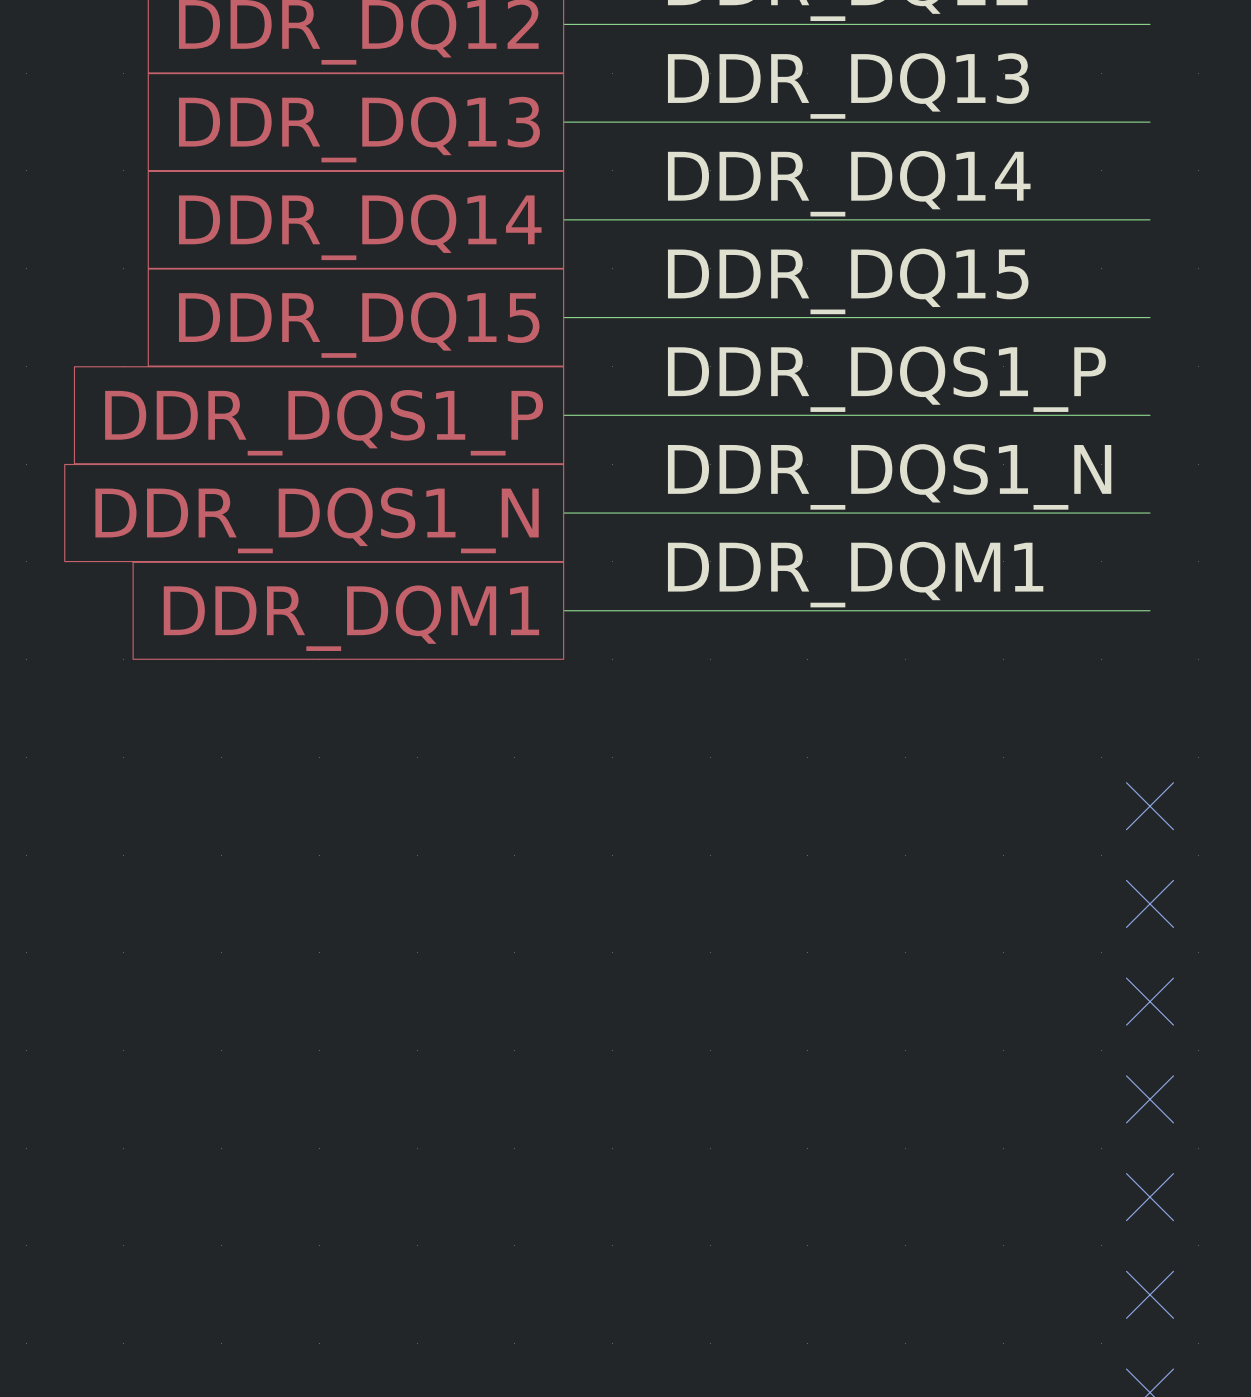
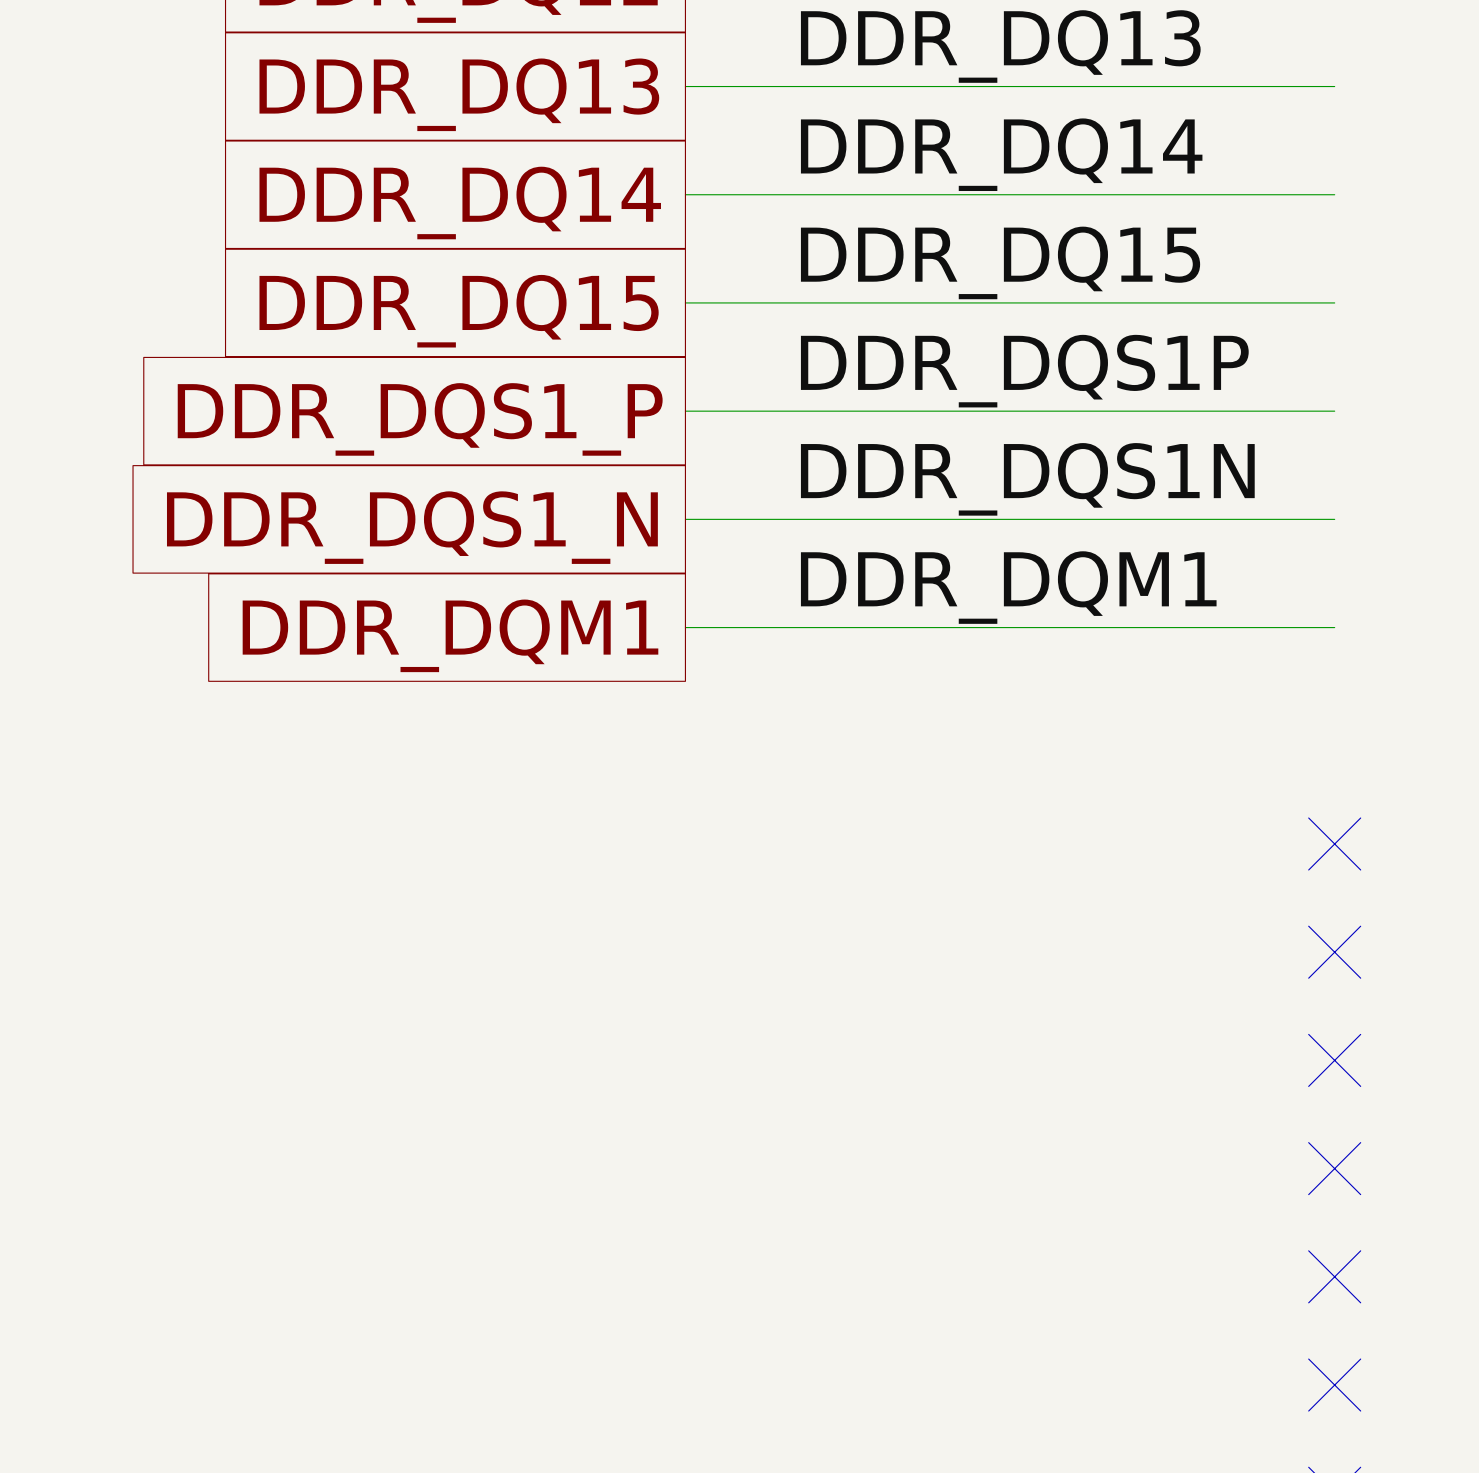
label: DDR_DQS1_P (886, 379) -> DDR_DQS1P (1024, 371)
label: DDR_DQS1_N (889, 476) -> DDR_DQS1N (1027, 479)

